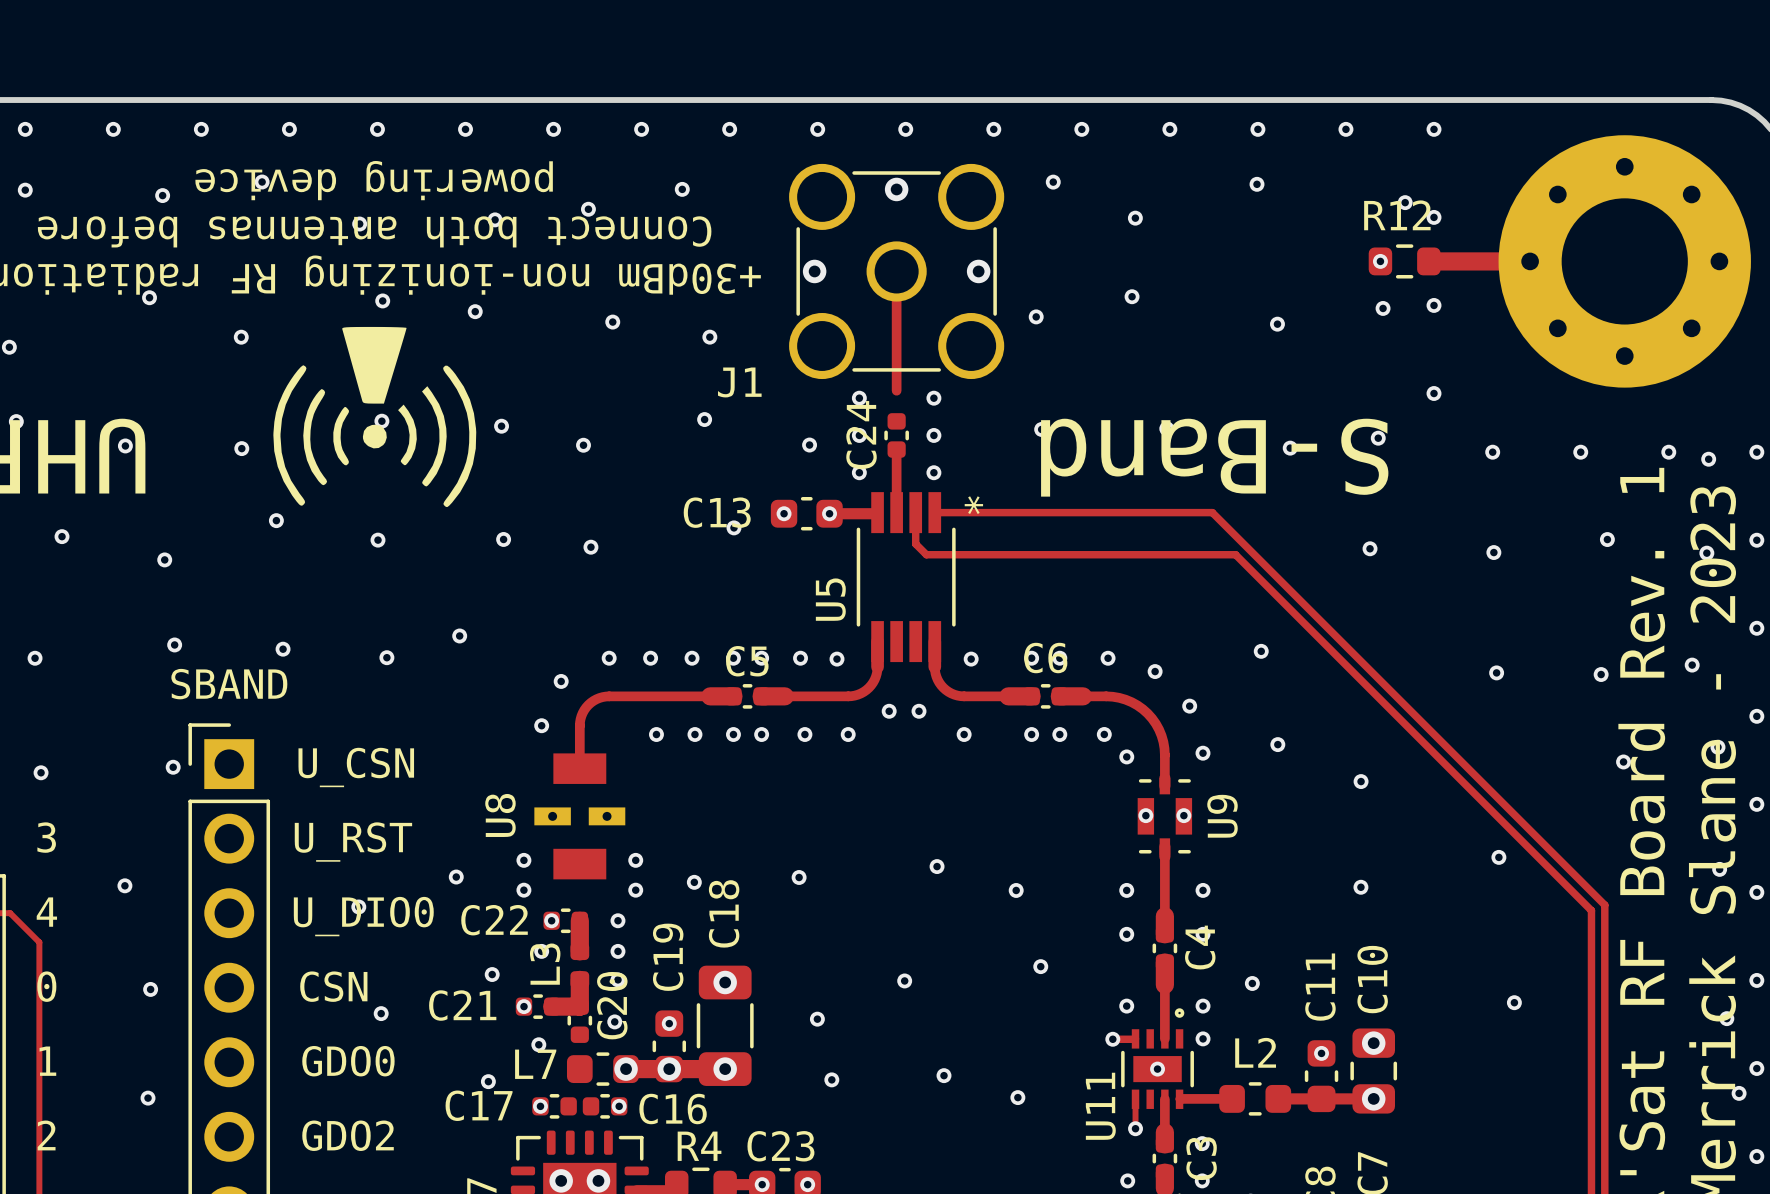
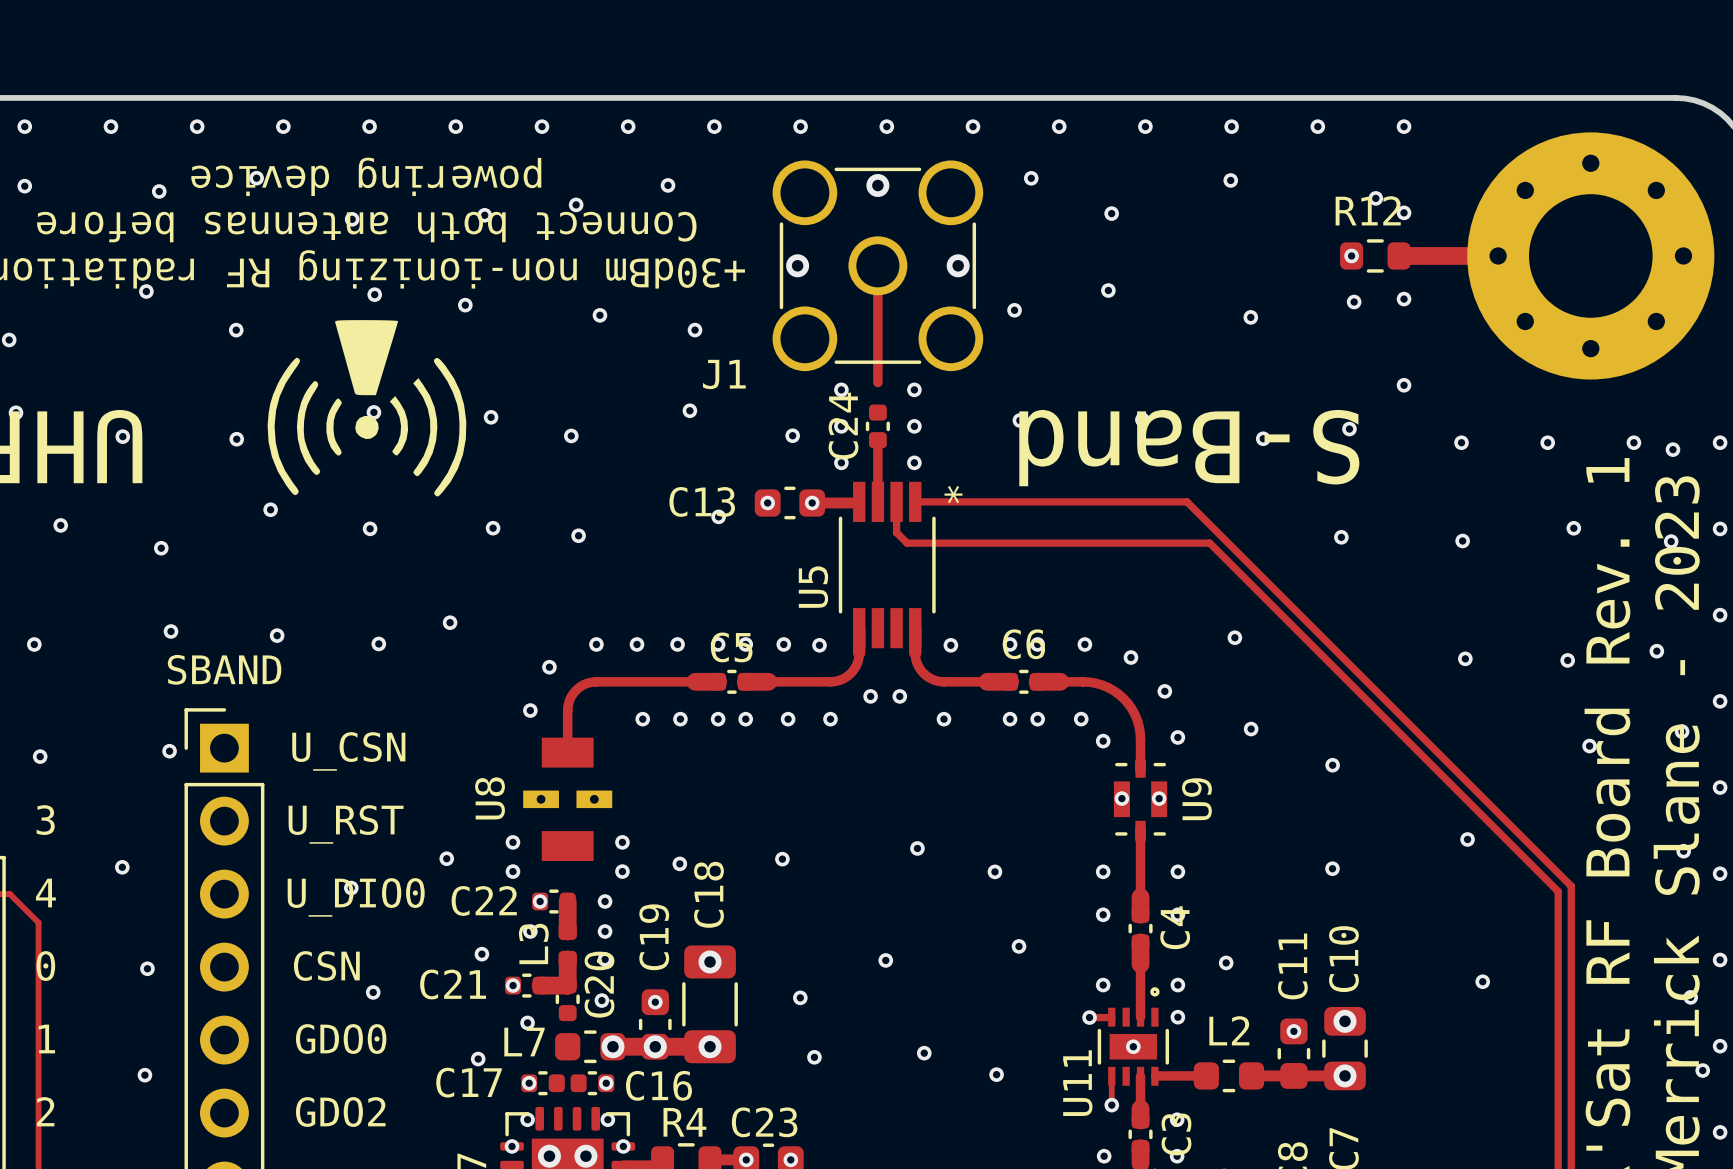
via: none -> (527, 1119)
via: none -> (607, 1119)
via: none -> (512, 1146)
via: none -> (623, 1146)

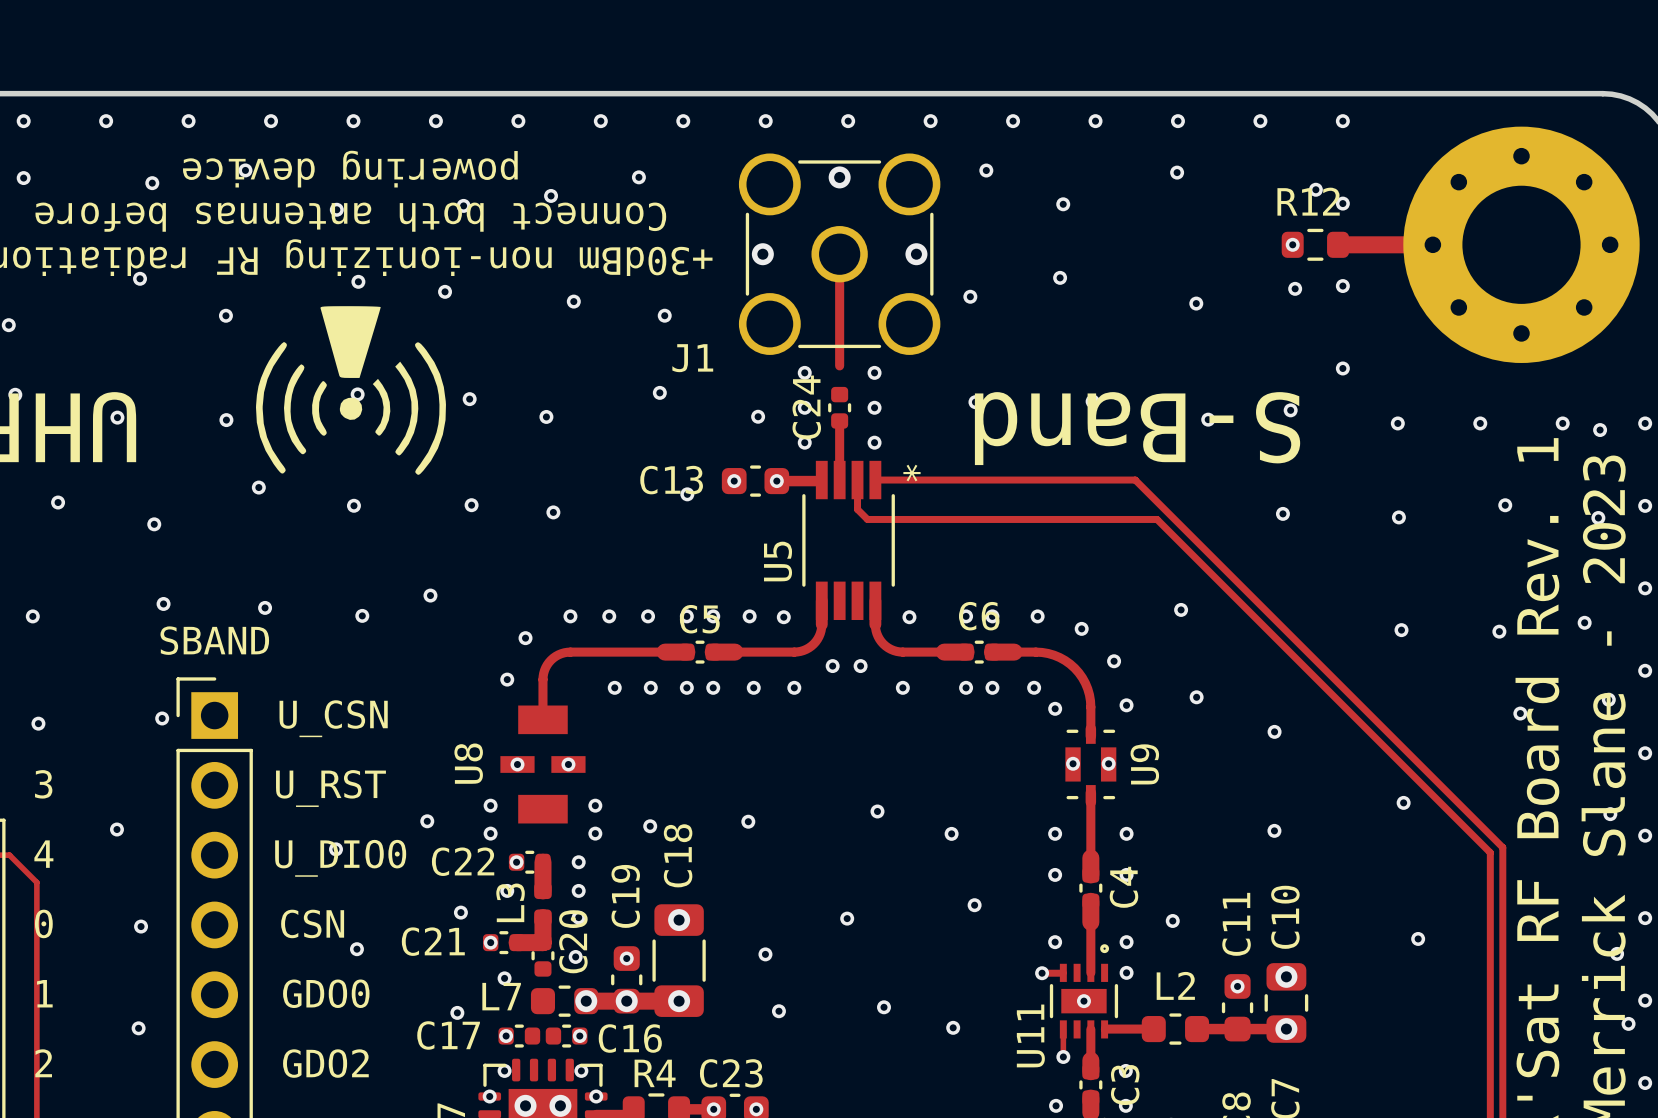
U8 footprint: [523, 737, 613, 861] -> [500, 705, 586, 824]
via: none -> (517, 764)
via: none -> (568, 764)

